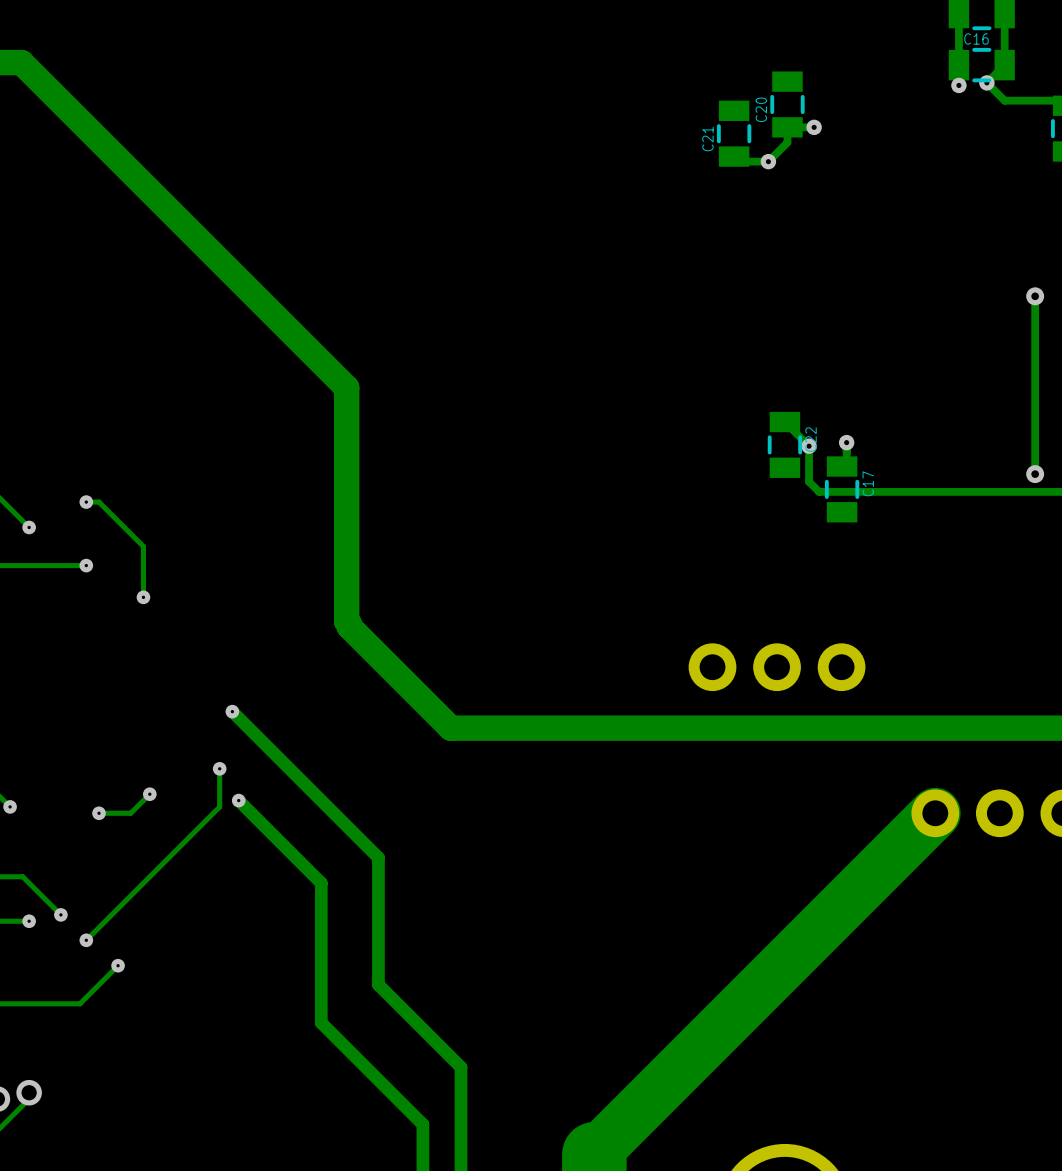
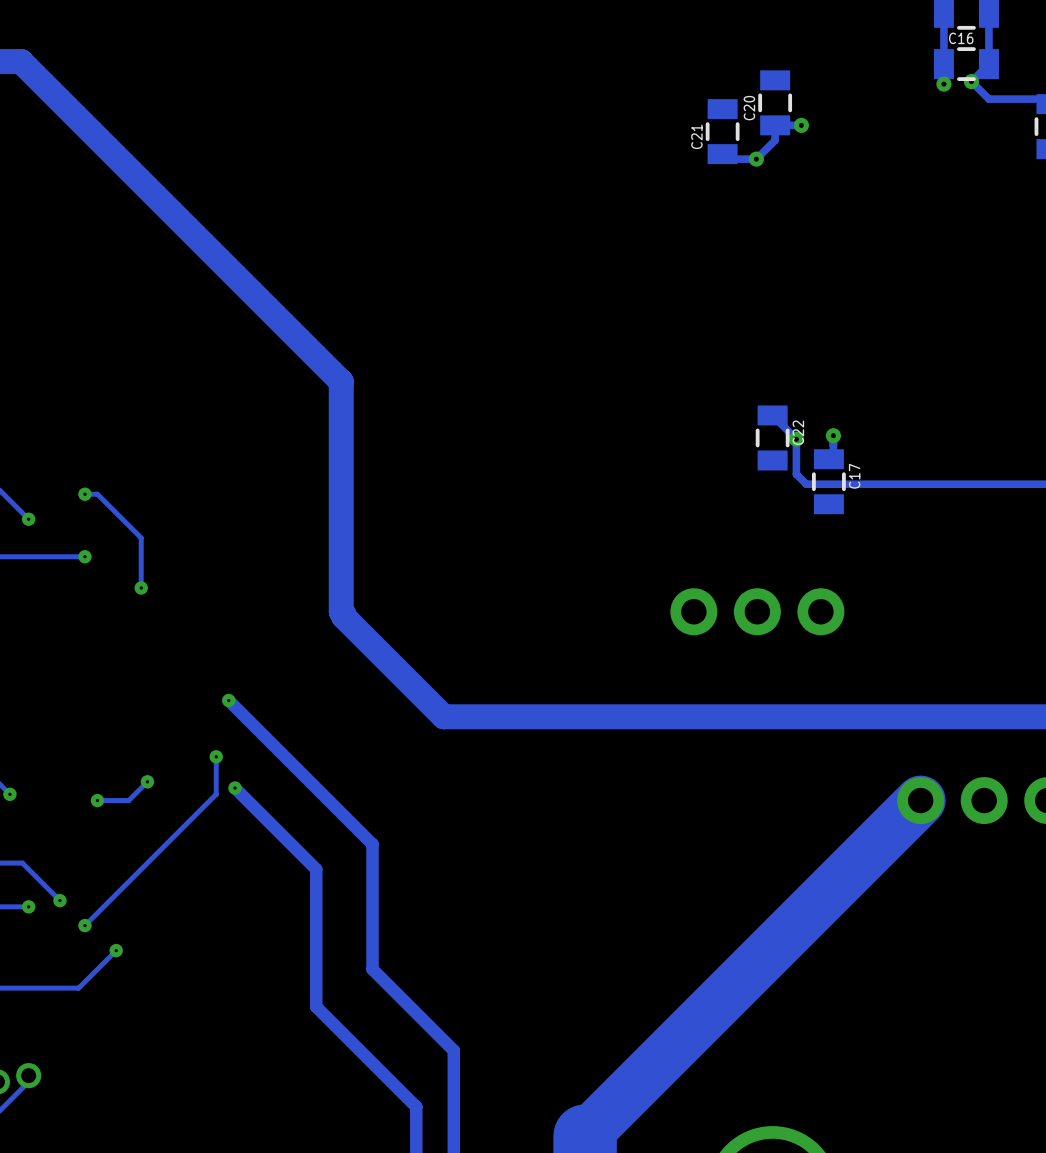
track: (1035, 296) (1035, 474) -> none
via: (1035, 296) -> none
via: (1035, 474) -> none
part position: (777, 667) -> (757, 611)

